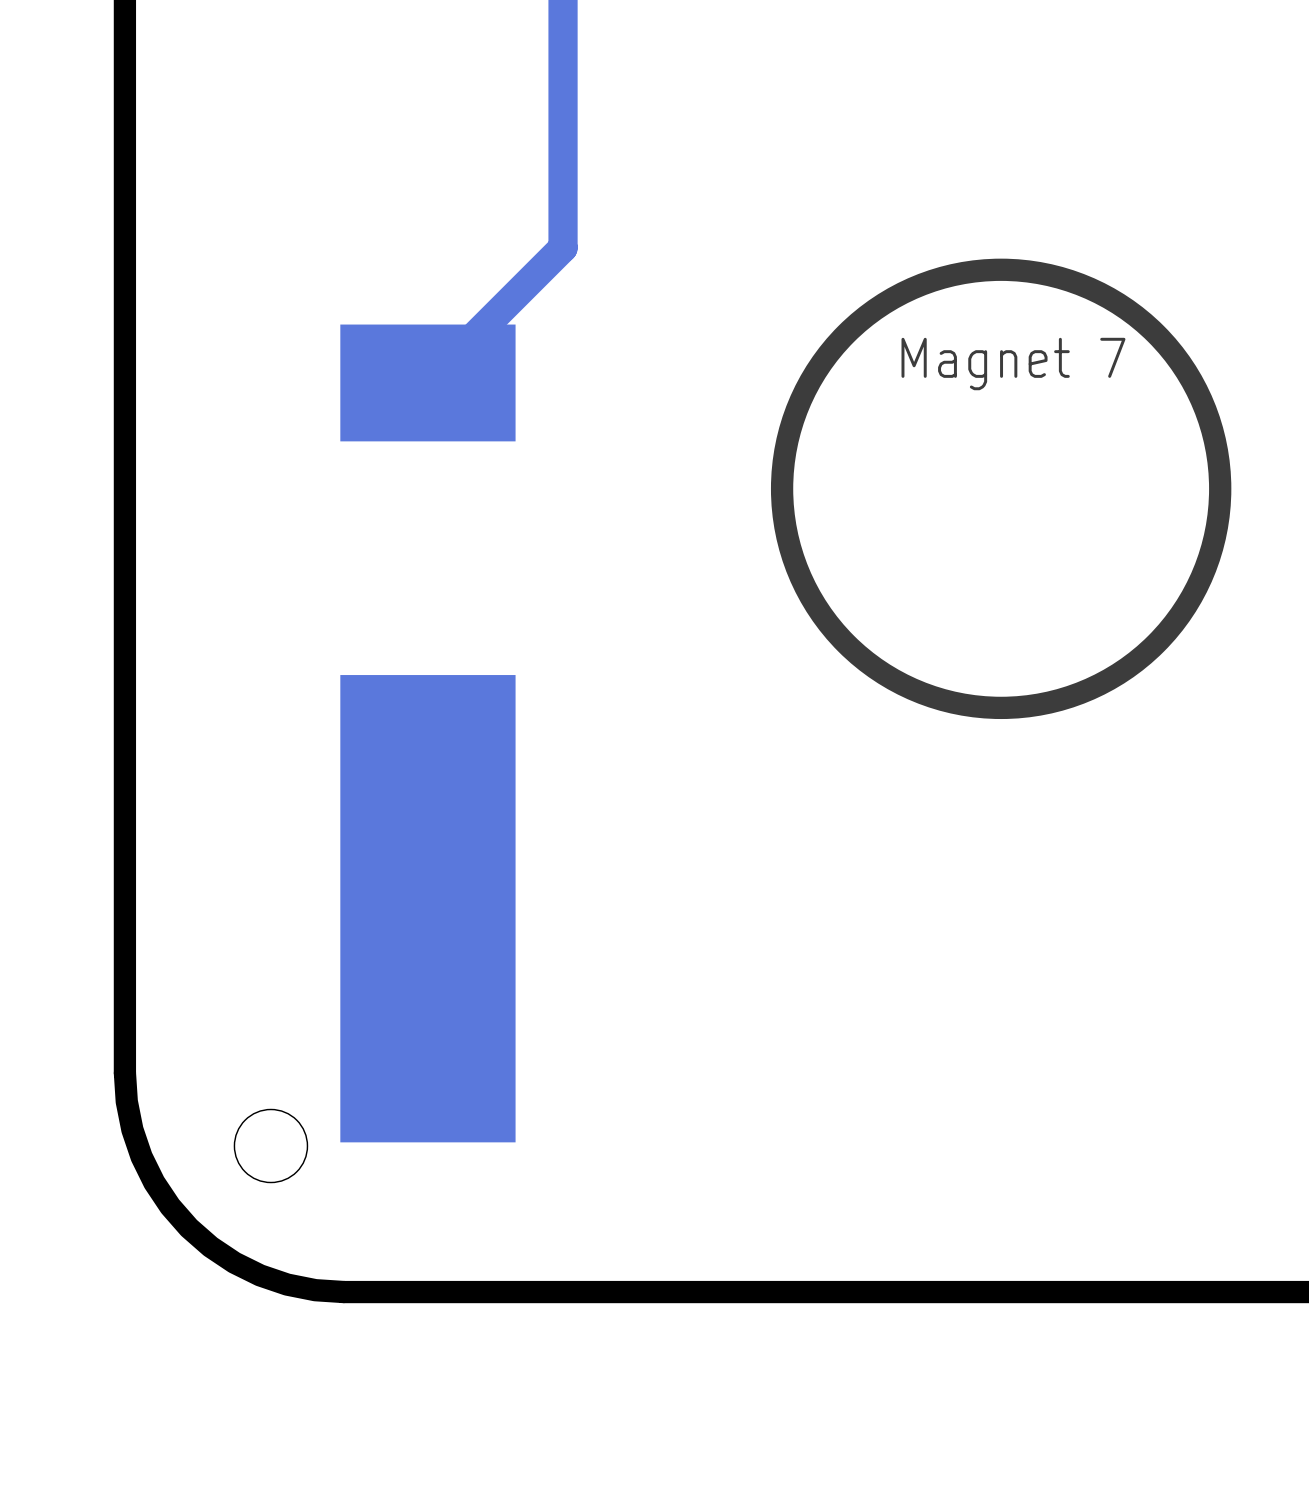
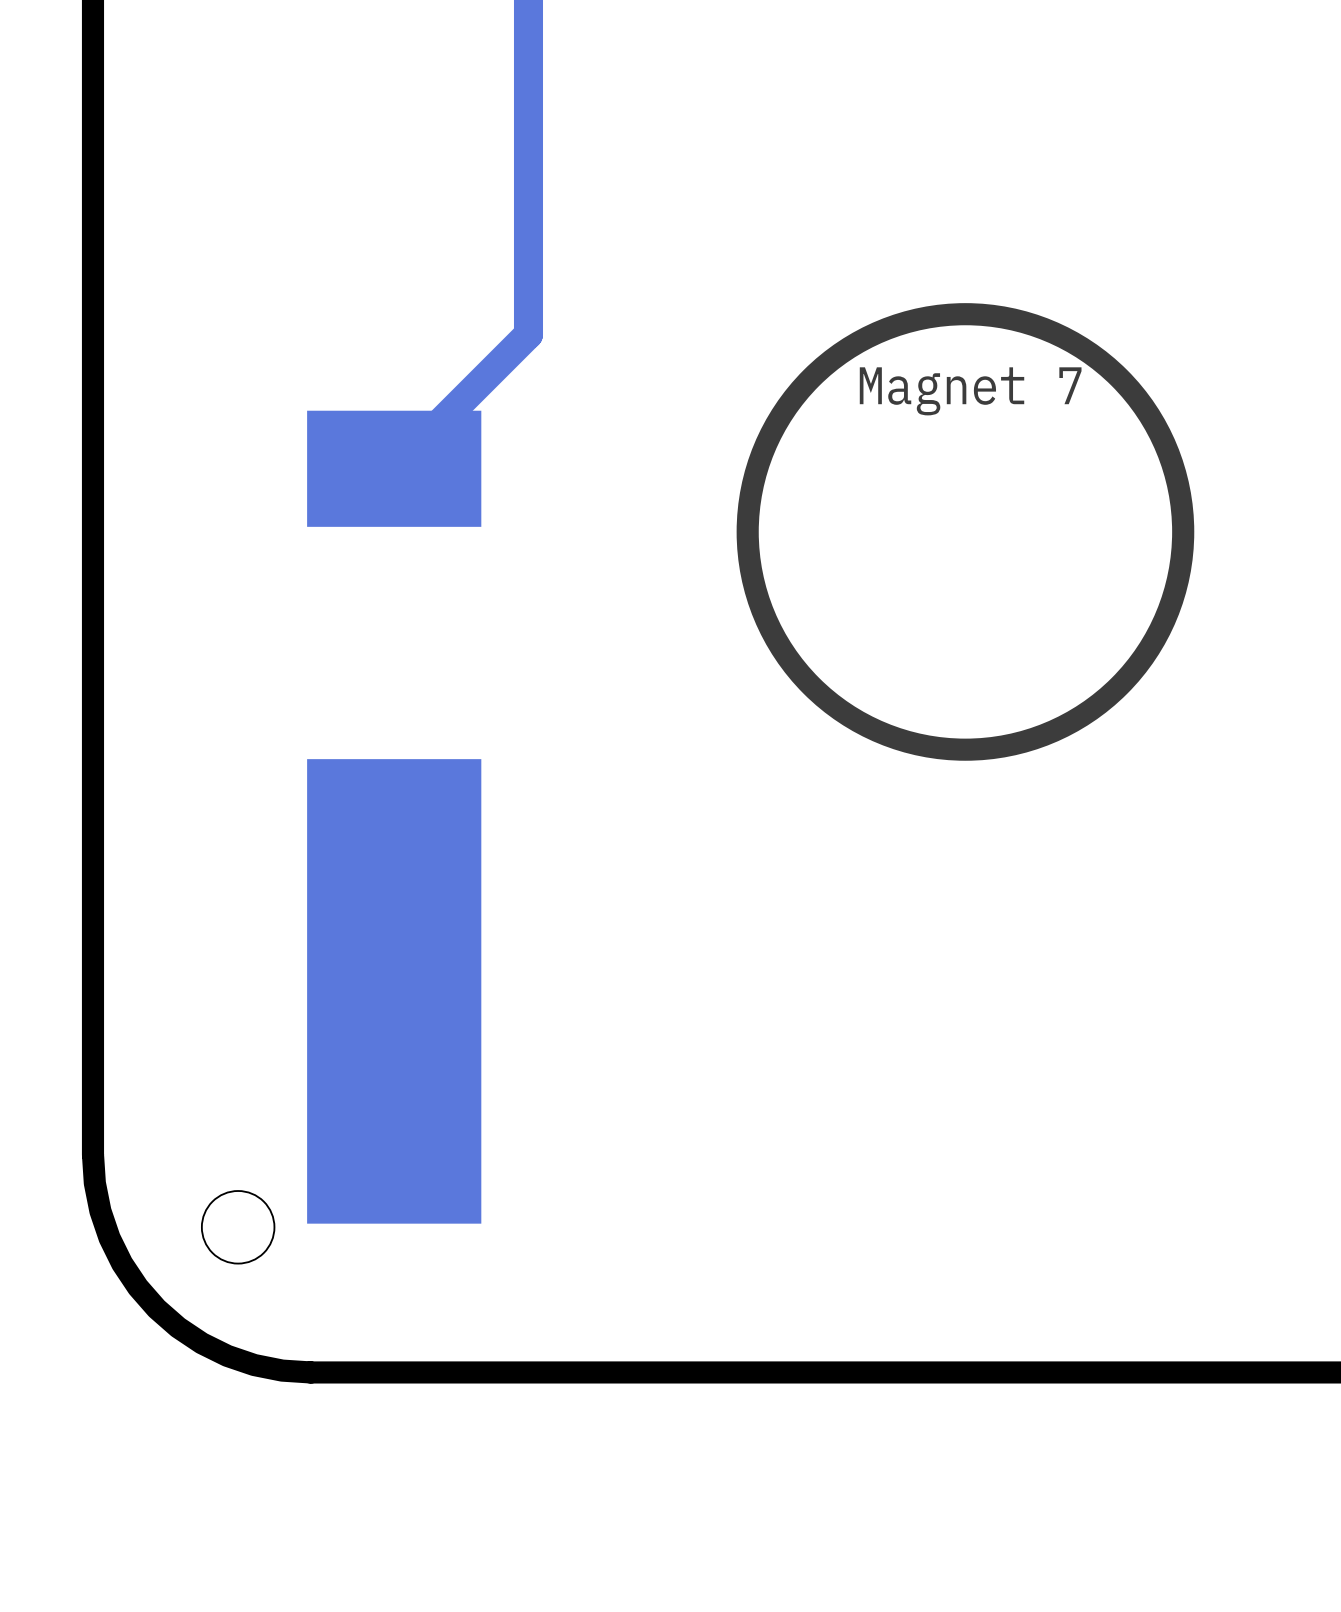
text position: Magnet 7 (1013, 364) -> Magnet 7 (970, 391)
drawing position: (1001, 488) -> (965, 531)

